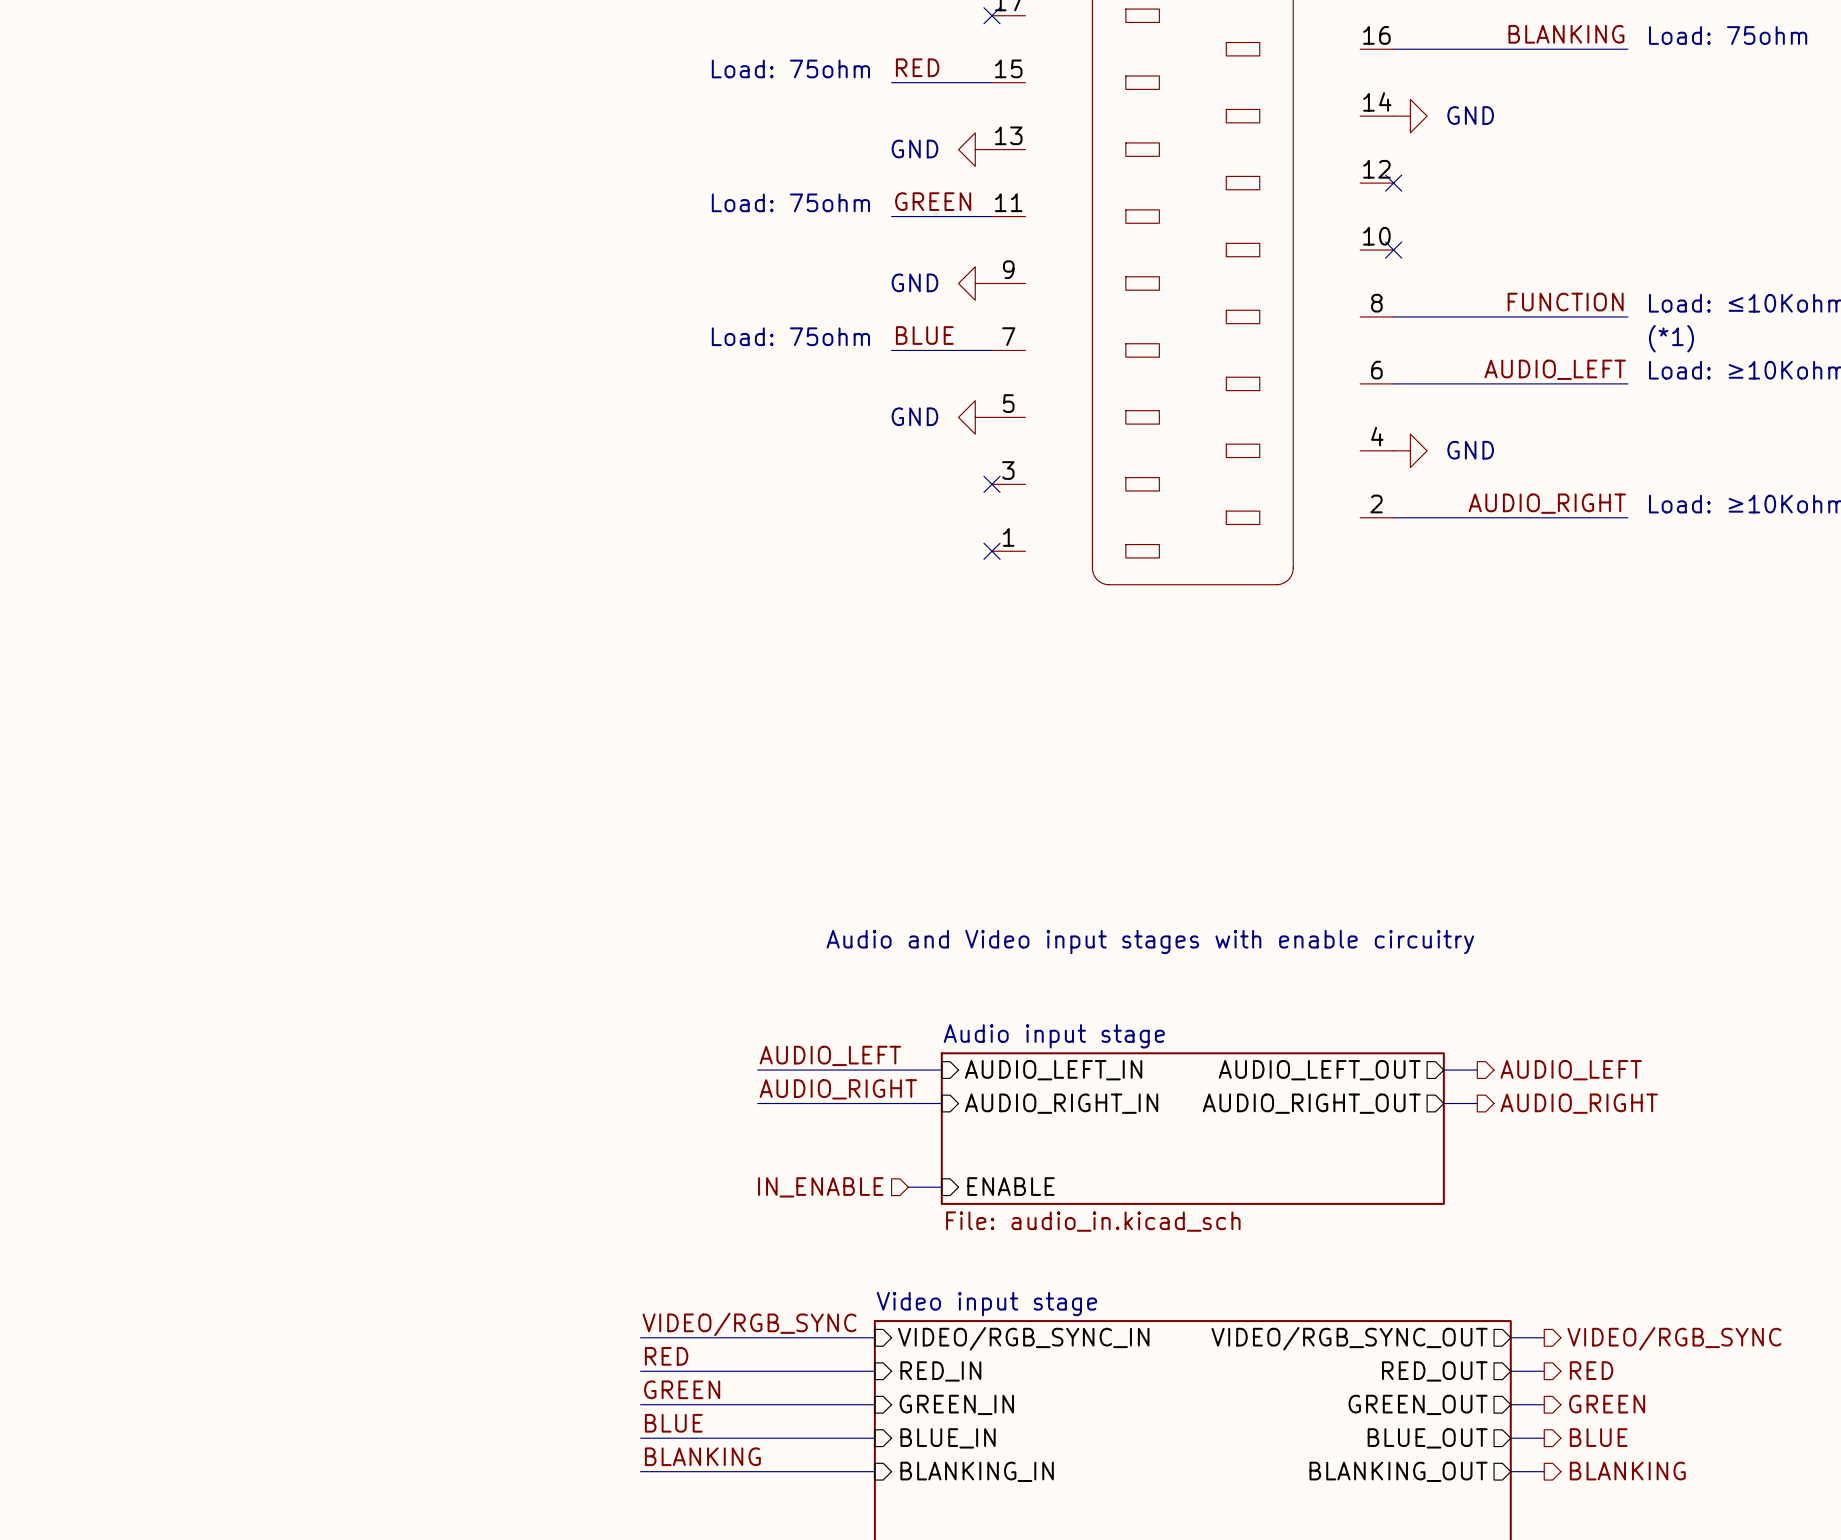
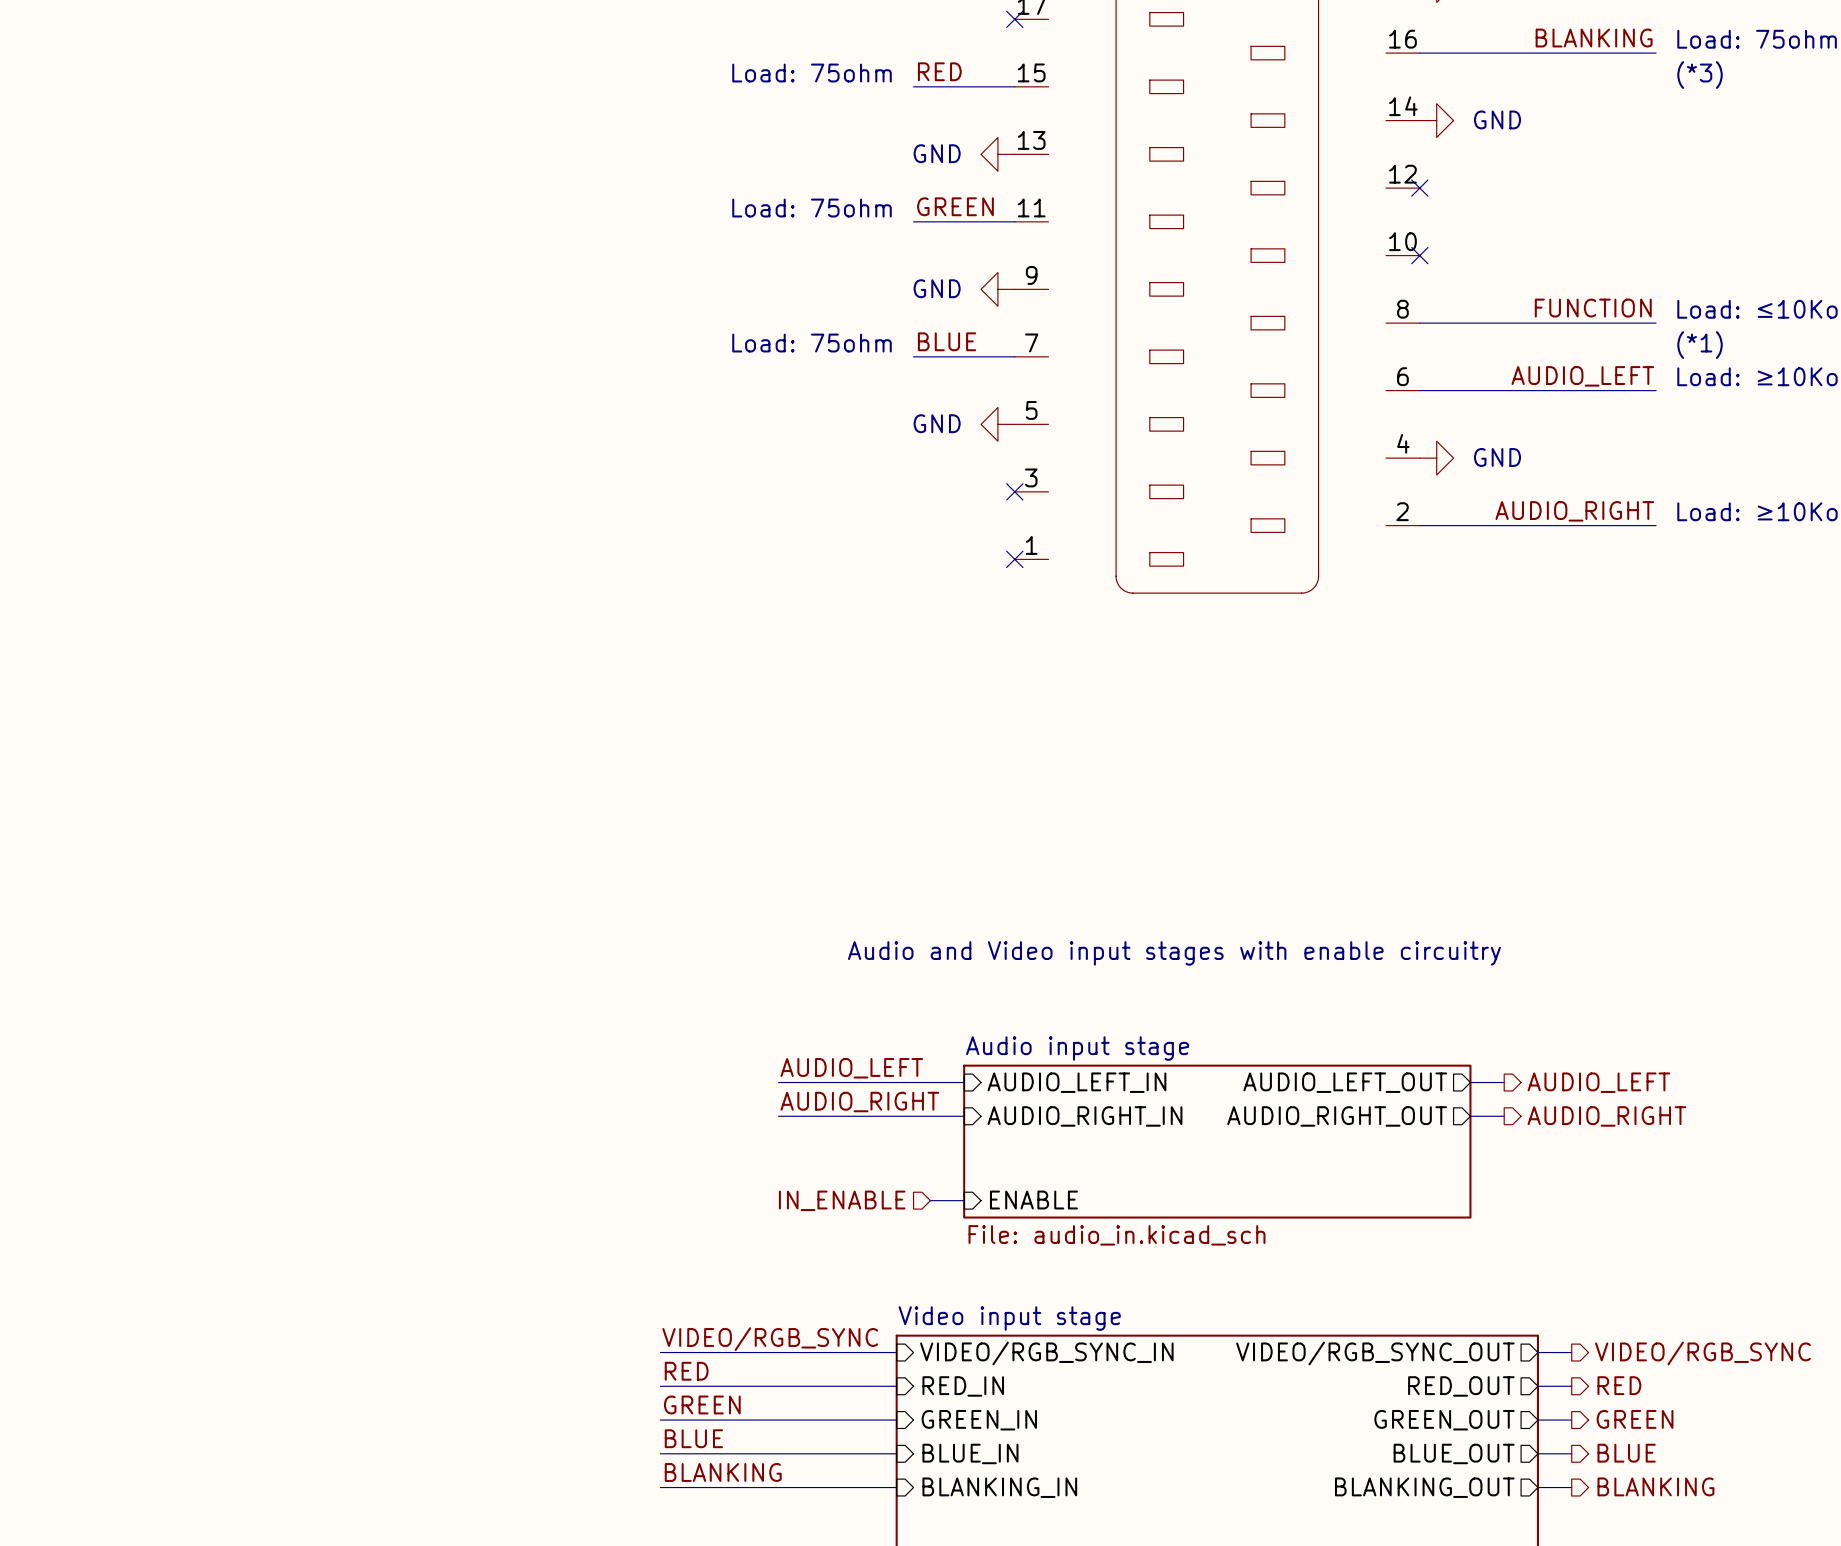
text: none -> (*3) (1700, 75)

